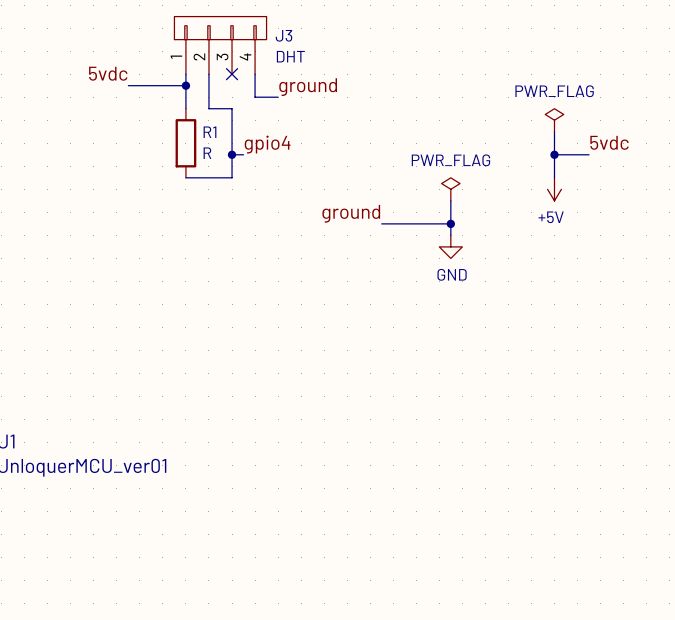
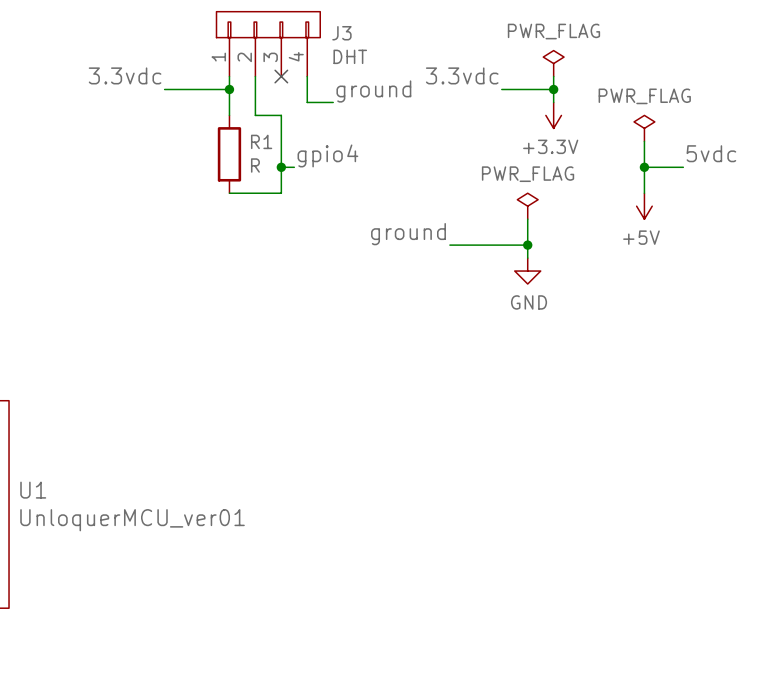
power symbol: none -> PWR_FLAG (553, 63)
label: 5vdc (108, 73) -> 3.3vdc (125, 75)
label: none -> 3.3vdc (462, 75)
wire: none -> (553, 76) (553, 102)
wire: none -> (501, 89) (553, 89)
junction: none -> (553, 89)
power symbol: none -> +3.3V (553, 115)

